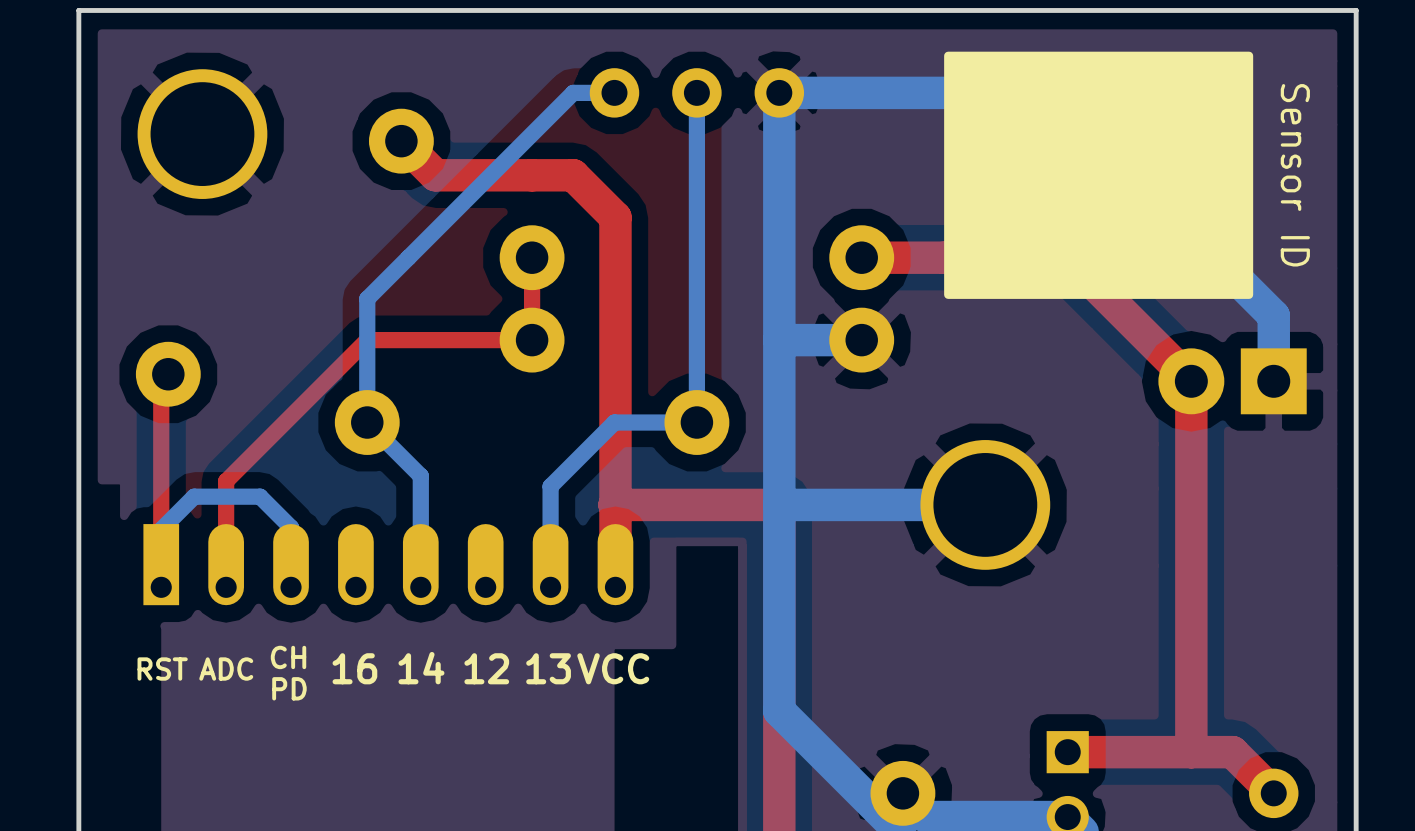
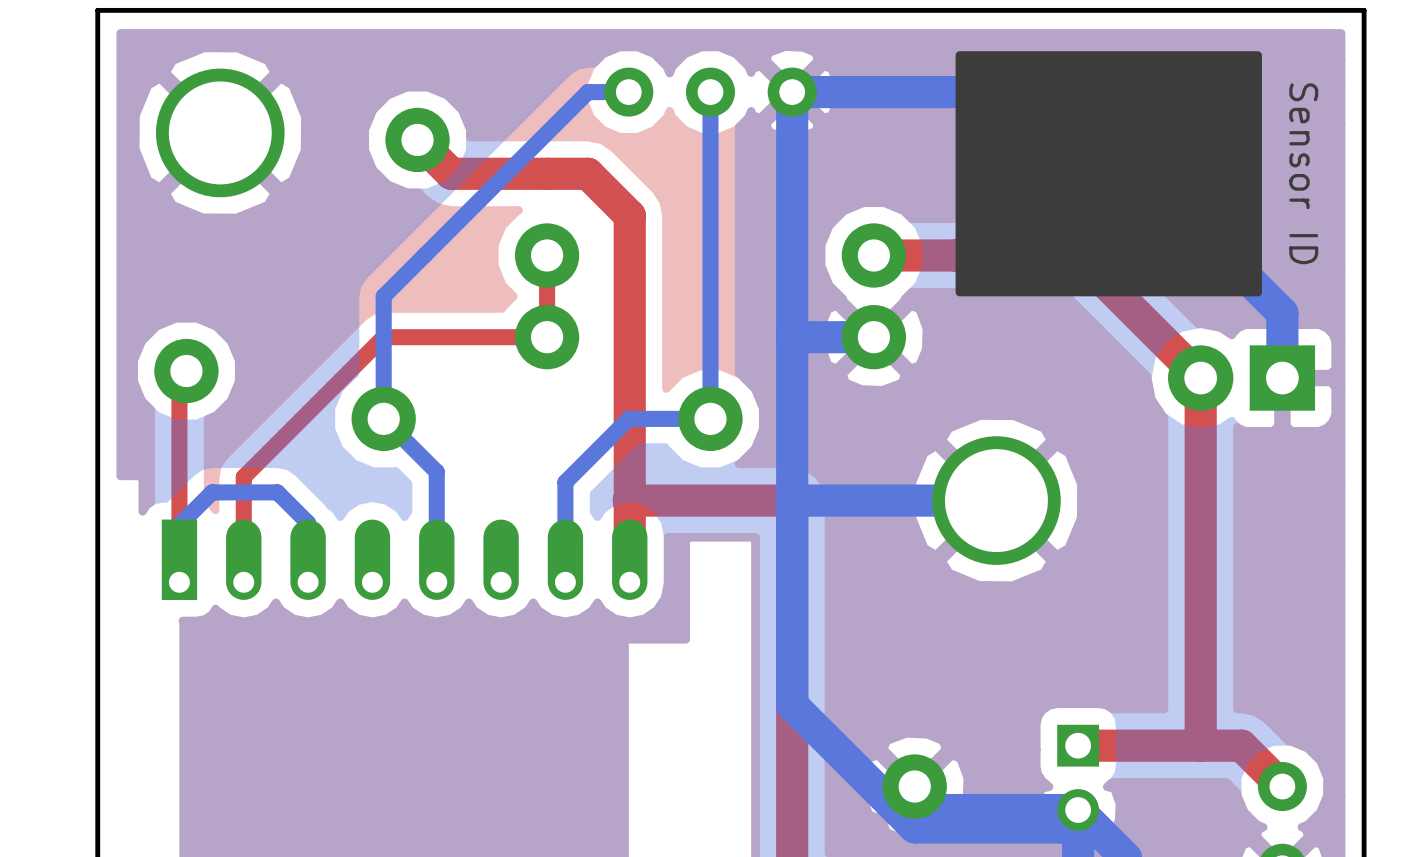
text: CH (288, 657) -> none
text: 16 (354, 668) -> none
text: 14 (421, 668) -> none
text: 12 (486, 668) -> none
text: 13 (548, 668) -> none
text: VCC (613, 668) -> none
text: RST (162, 669) -> none
text: ADC (226, 669) -> none
text: PD (289, 688) -> none

